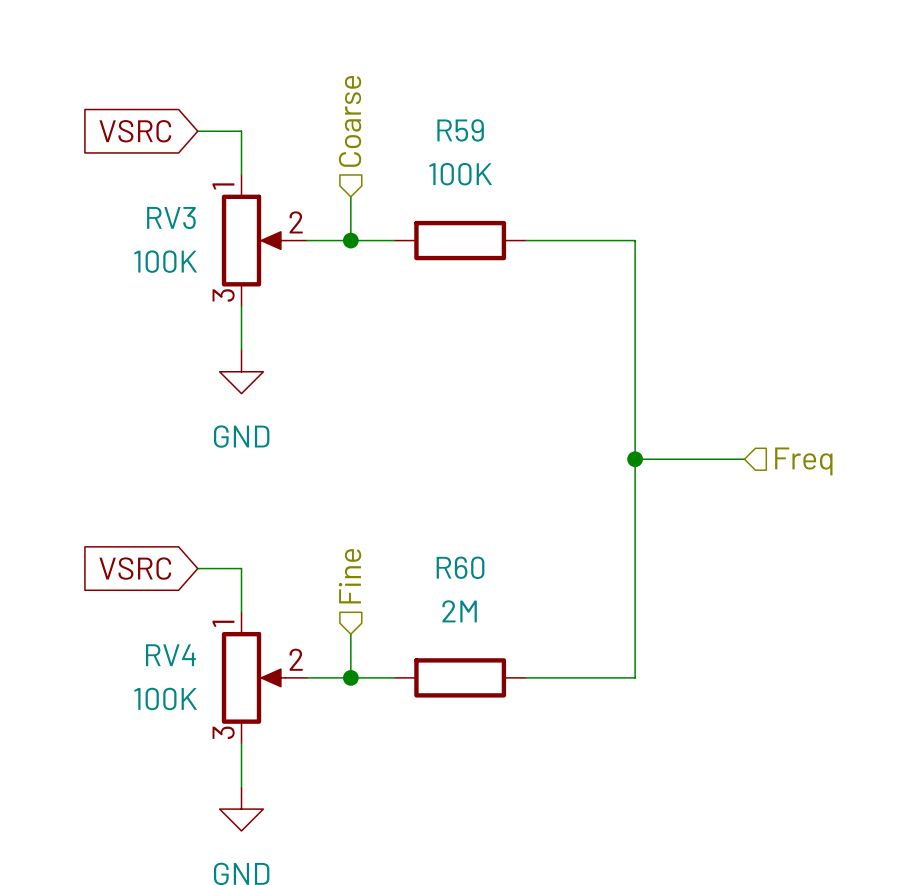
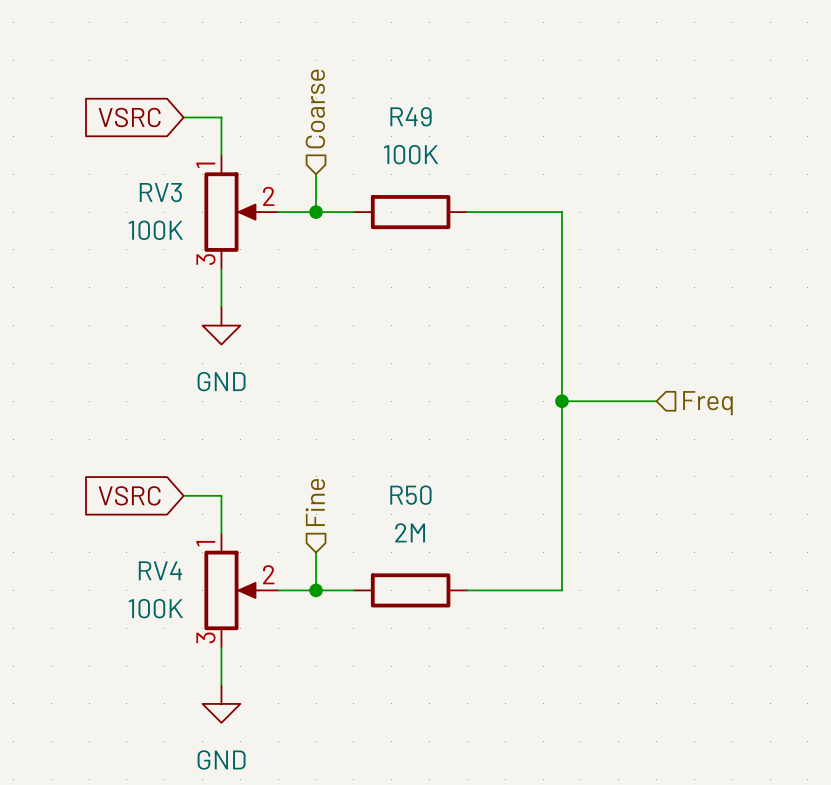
R59 name: R59 (460, 130) -> R49 (411, 116)
R60 name: R60 (460, 567) -> R50 (410, 495)

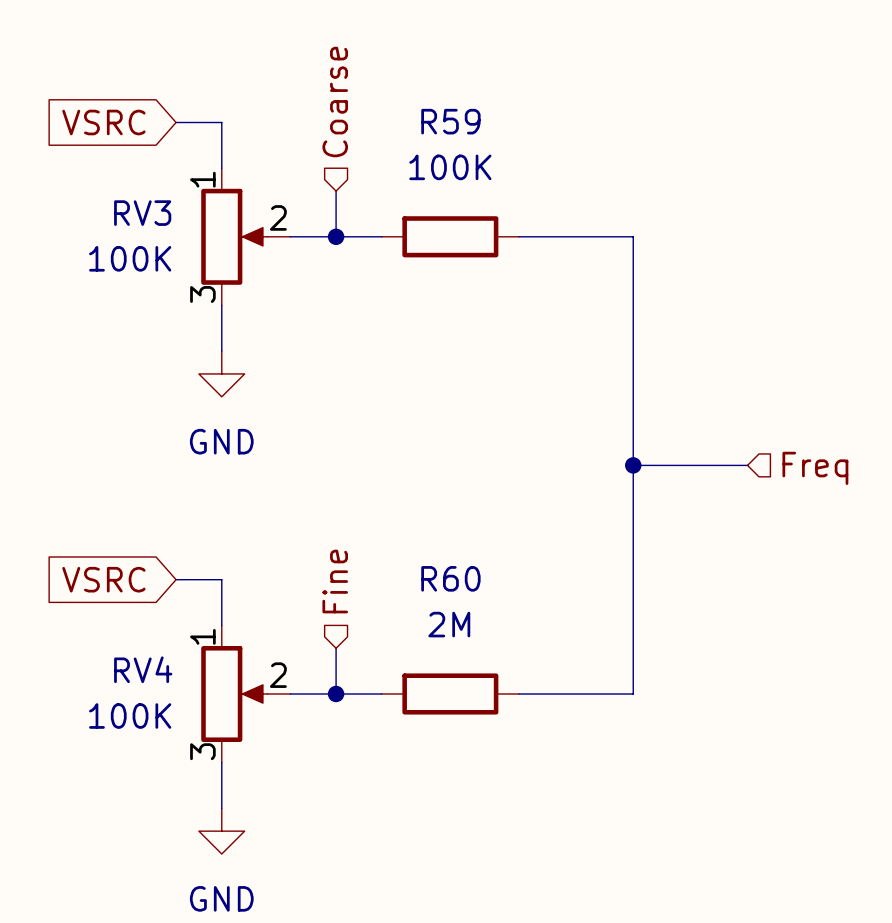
R49 name: R49 (411, 116) -> R59 (450, 121)
R50 name: R50 (410, 495) -> R60 (450, 578)

